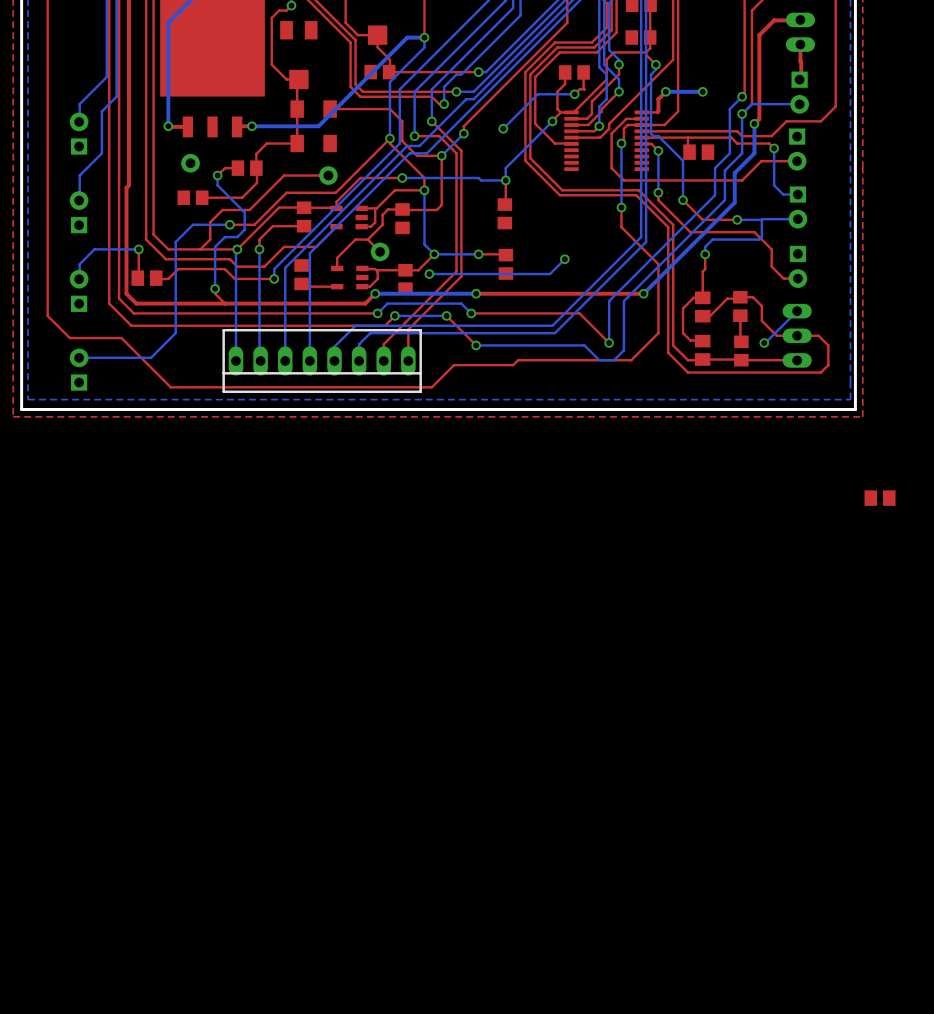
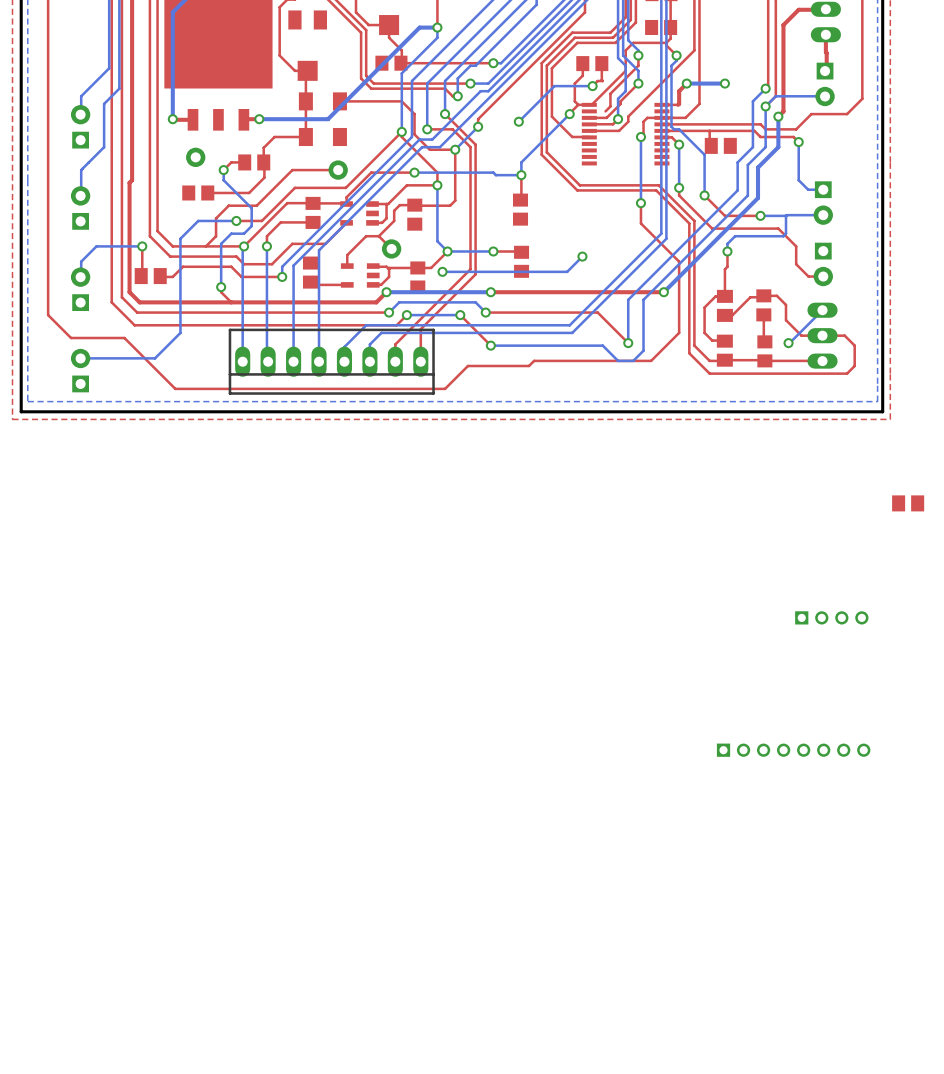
top track: (587, 118) (571, 118) -> none
top track: (641, 118) (626, 118) (611, 133) (611, 168) (623, 180) (742, 180) (761, 161) (797, 161) -> none
part: (797, 149) -> none
part: none -> (831, 617)
part: none -> (793, 750)

